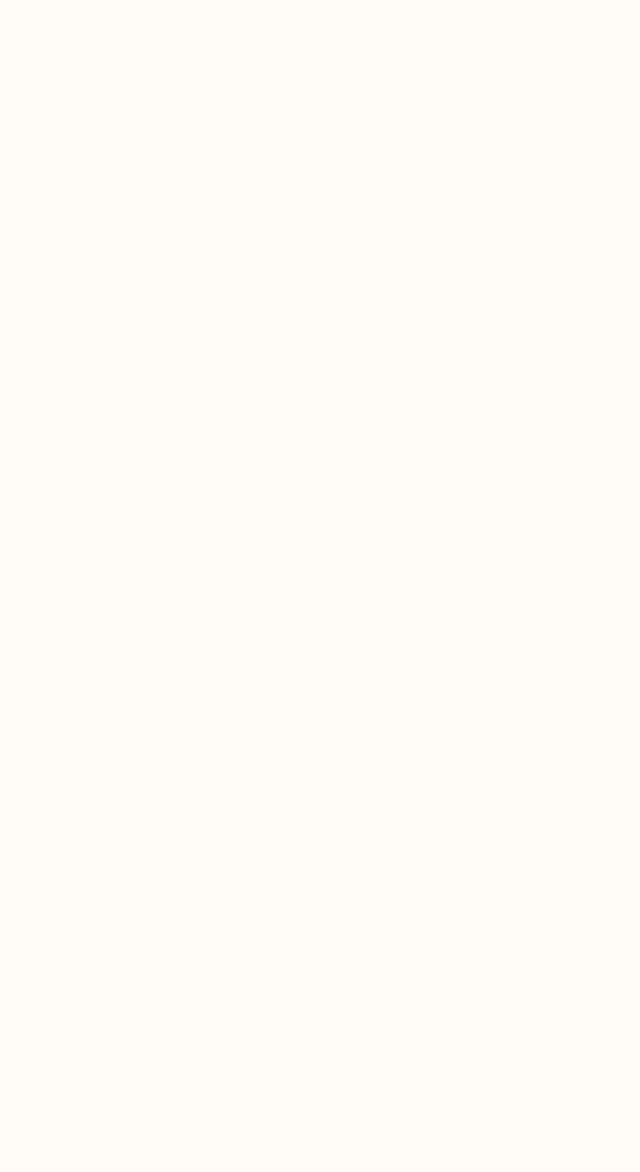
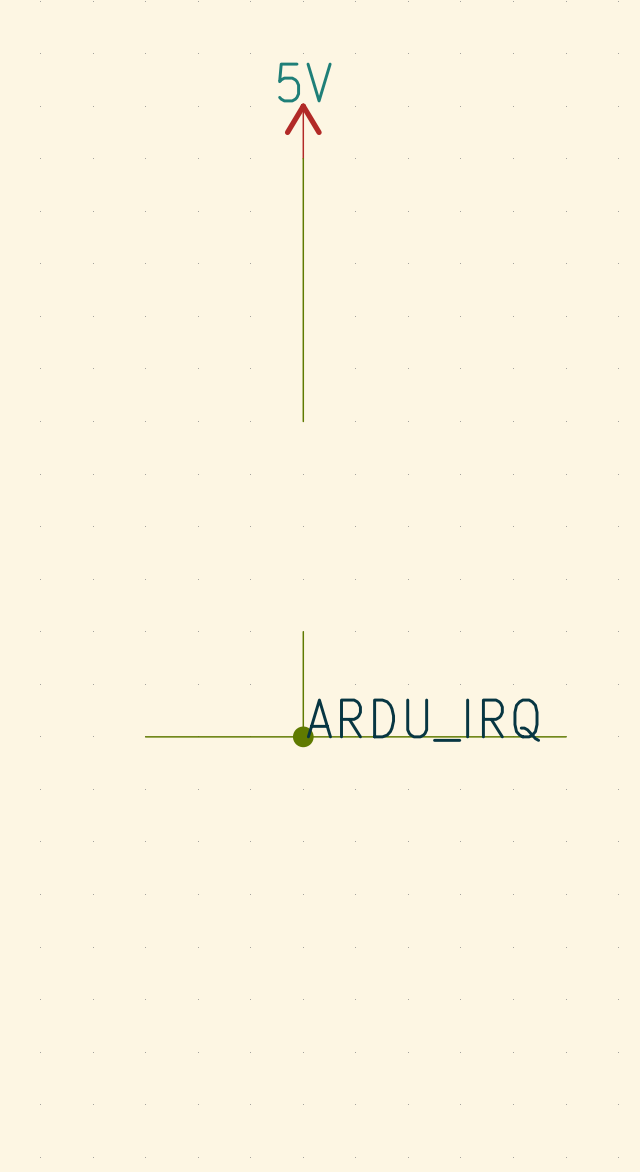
power symbol: none -> 5V (303, 131)
wire: none -> (303, 158) (303, 421)
wire: none -> (303, 631) (303, 736)
label: none -> ARDU_IRQ (423, 720)
wire: none -> (145, 736) (566, 736)
junction: none -> (303, 736)

